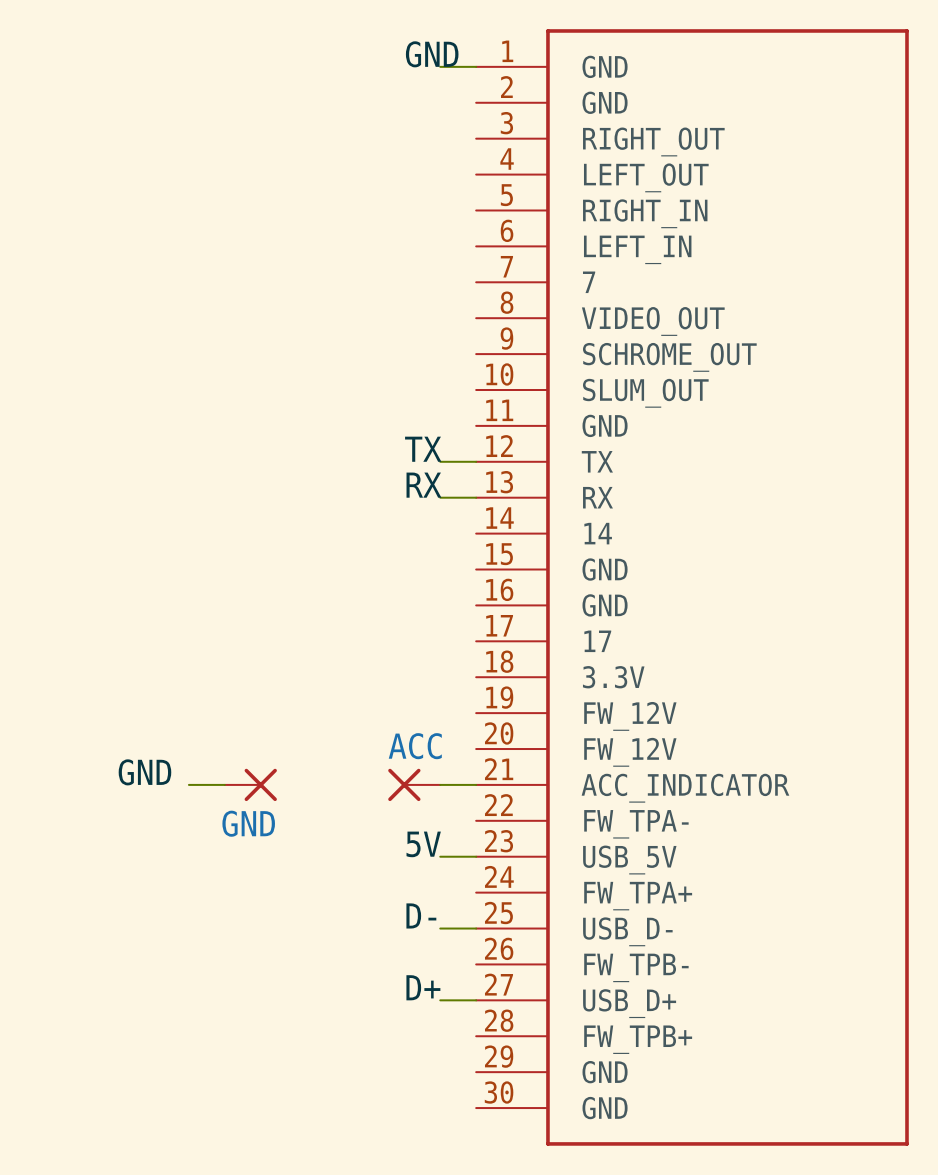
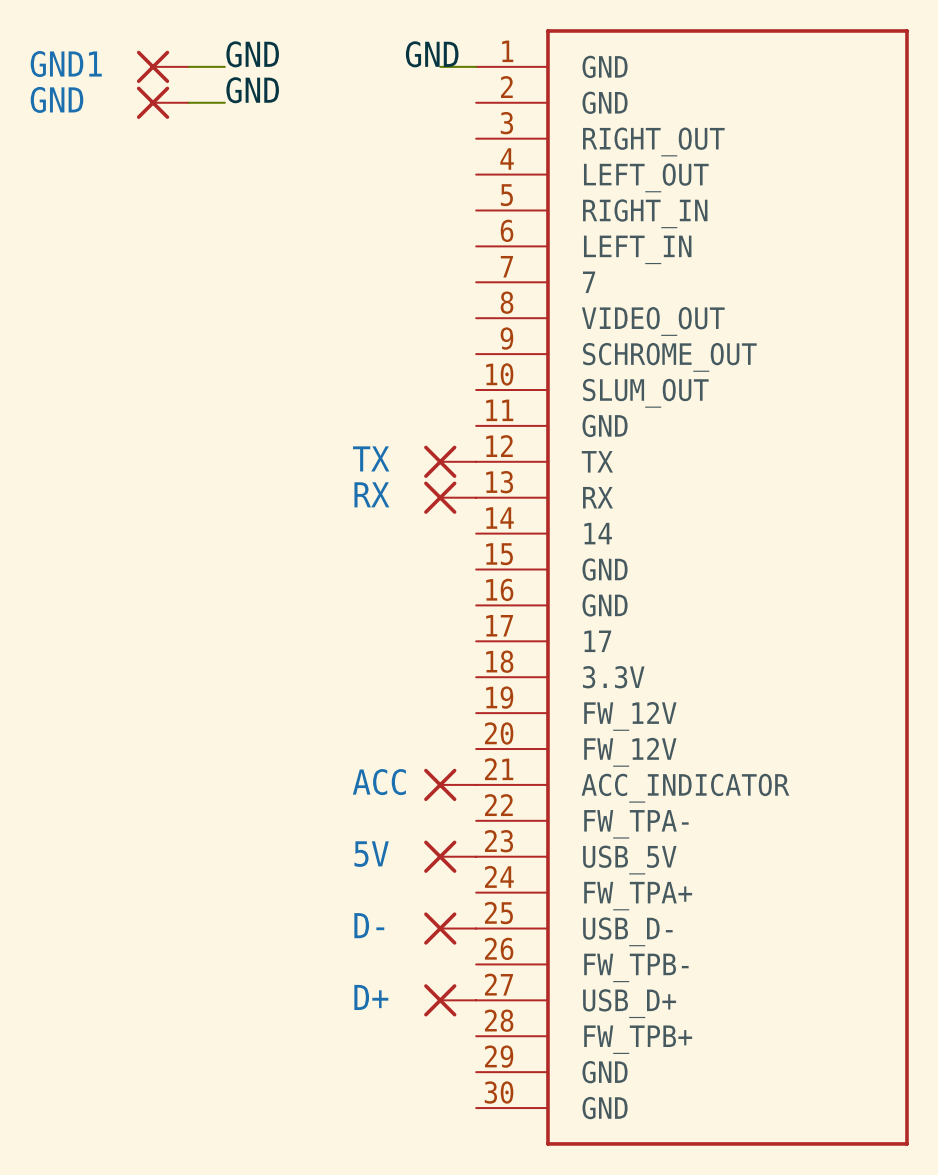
label: none -> GND (252, 54)
GND1: none -> (162, 66)
wire: none -> (188, 66) (224, 66)
label: none -> GND (252, 90)
GND: none -> (162, 102)
wire: none -> (188, 102) (224, 102)
label: TX (423, 449) -> none
TX: none -> (450, 461)
label: RX (423, 485) -> none
RX: none -> (450, 497)
ACC name position: ACC (415, 746) -> ACC (379, 782)
label: GND (144, 772) -> none
wire: (188, 784) (224, 784) -> none
GND: (250, 784) -> none
ACC position: (414, 784) -> (450, 784)
label: 5V (423, 844) -> none
5V: none -> (450, 856)
label: D- (421, 915) -> none
D-: none -> (450, 928)
label: D+ (423, 987) -> none
D+: none -> (450, 1000)

